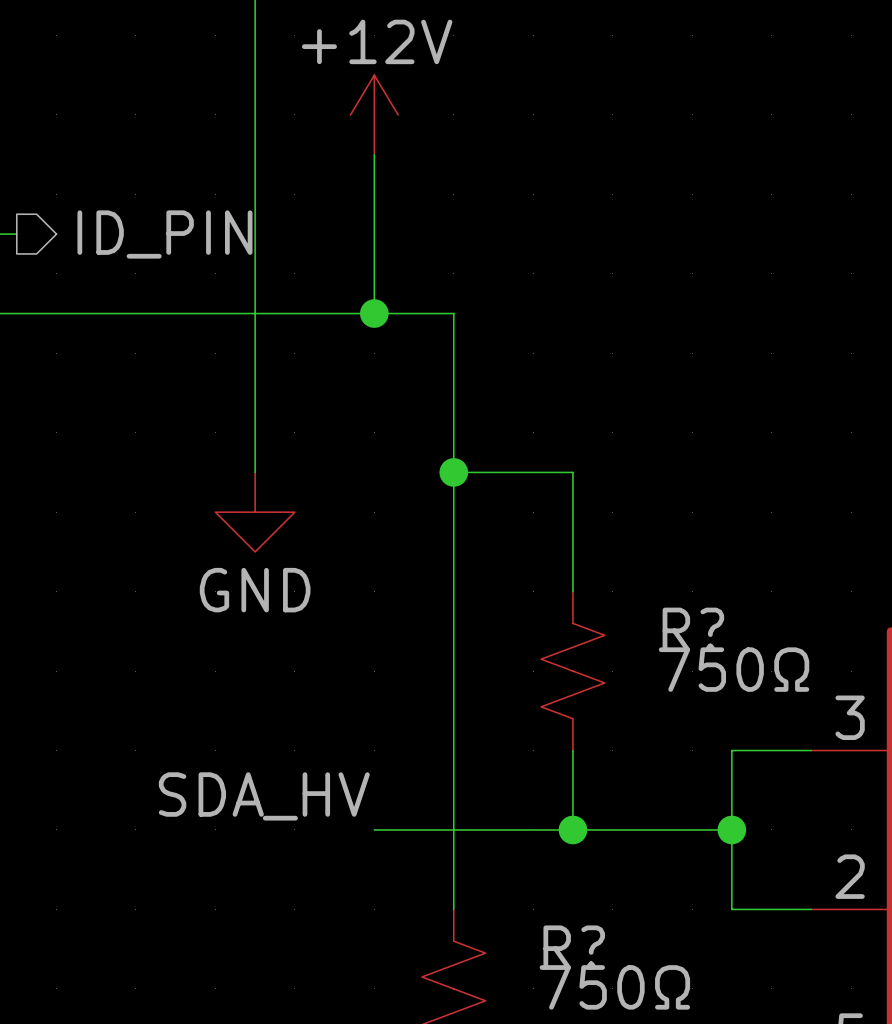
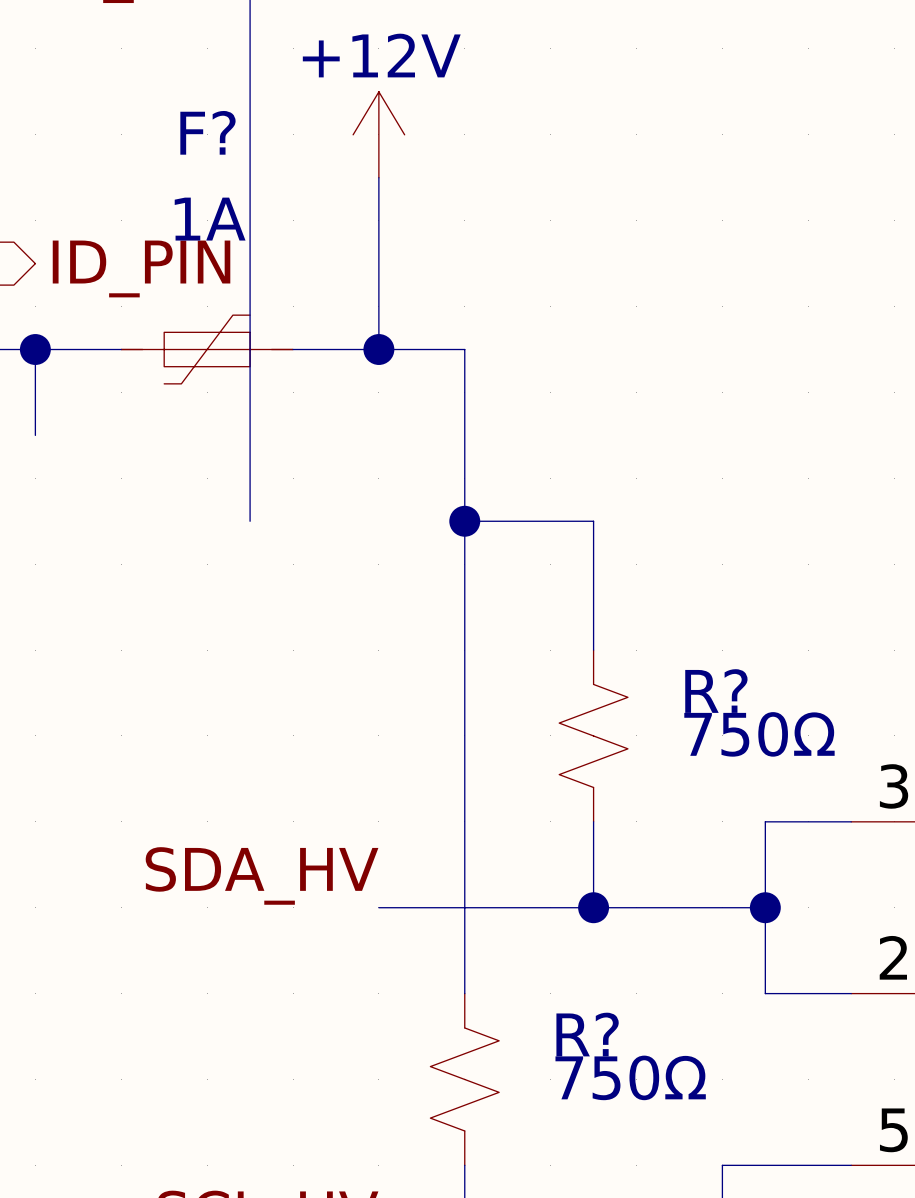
wire: none -> (35, 349) (35, 435)
junction: none -> (35, 349)
F?: none -> 1A (207, 349)
power symbol: GND (255, 512) -> none

